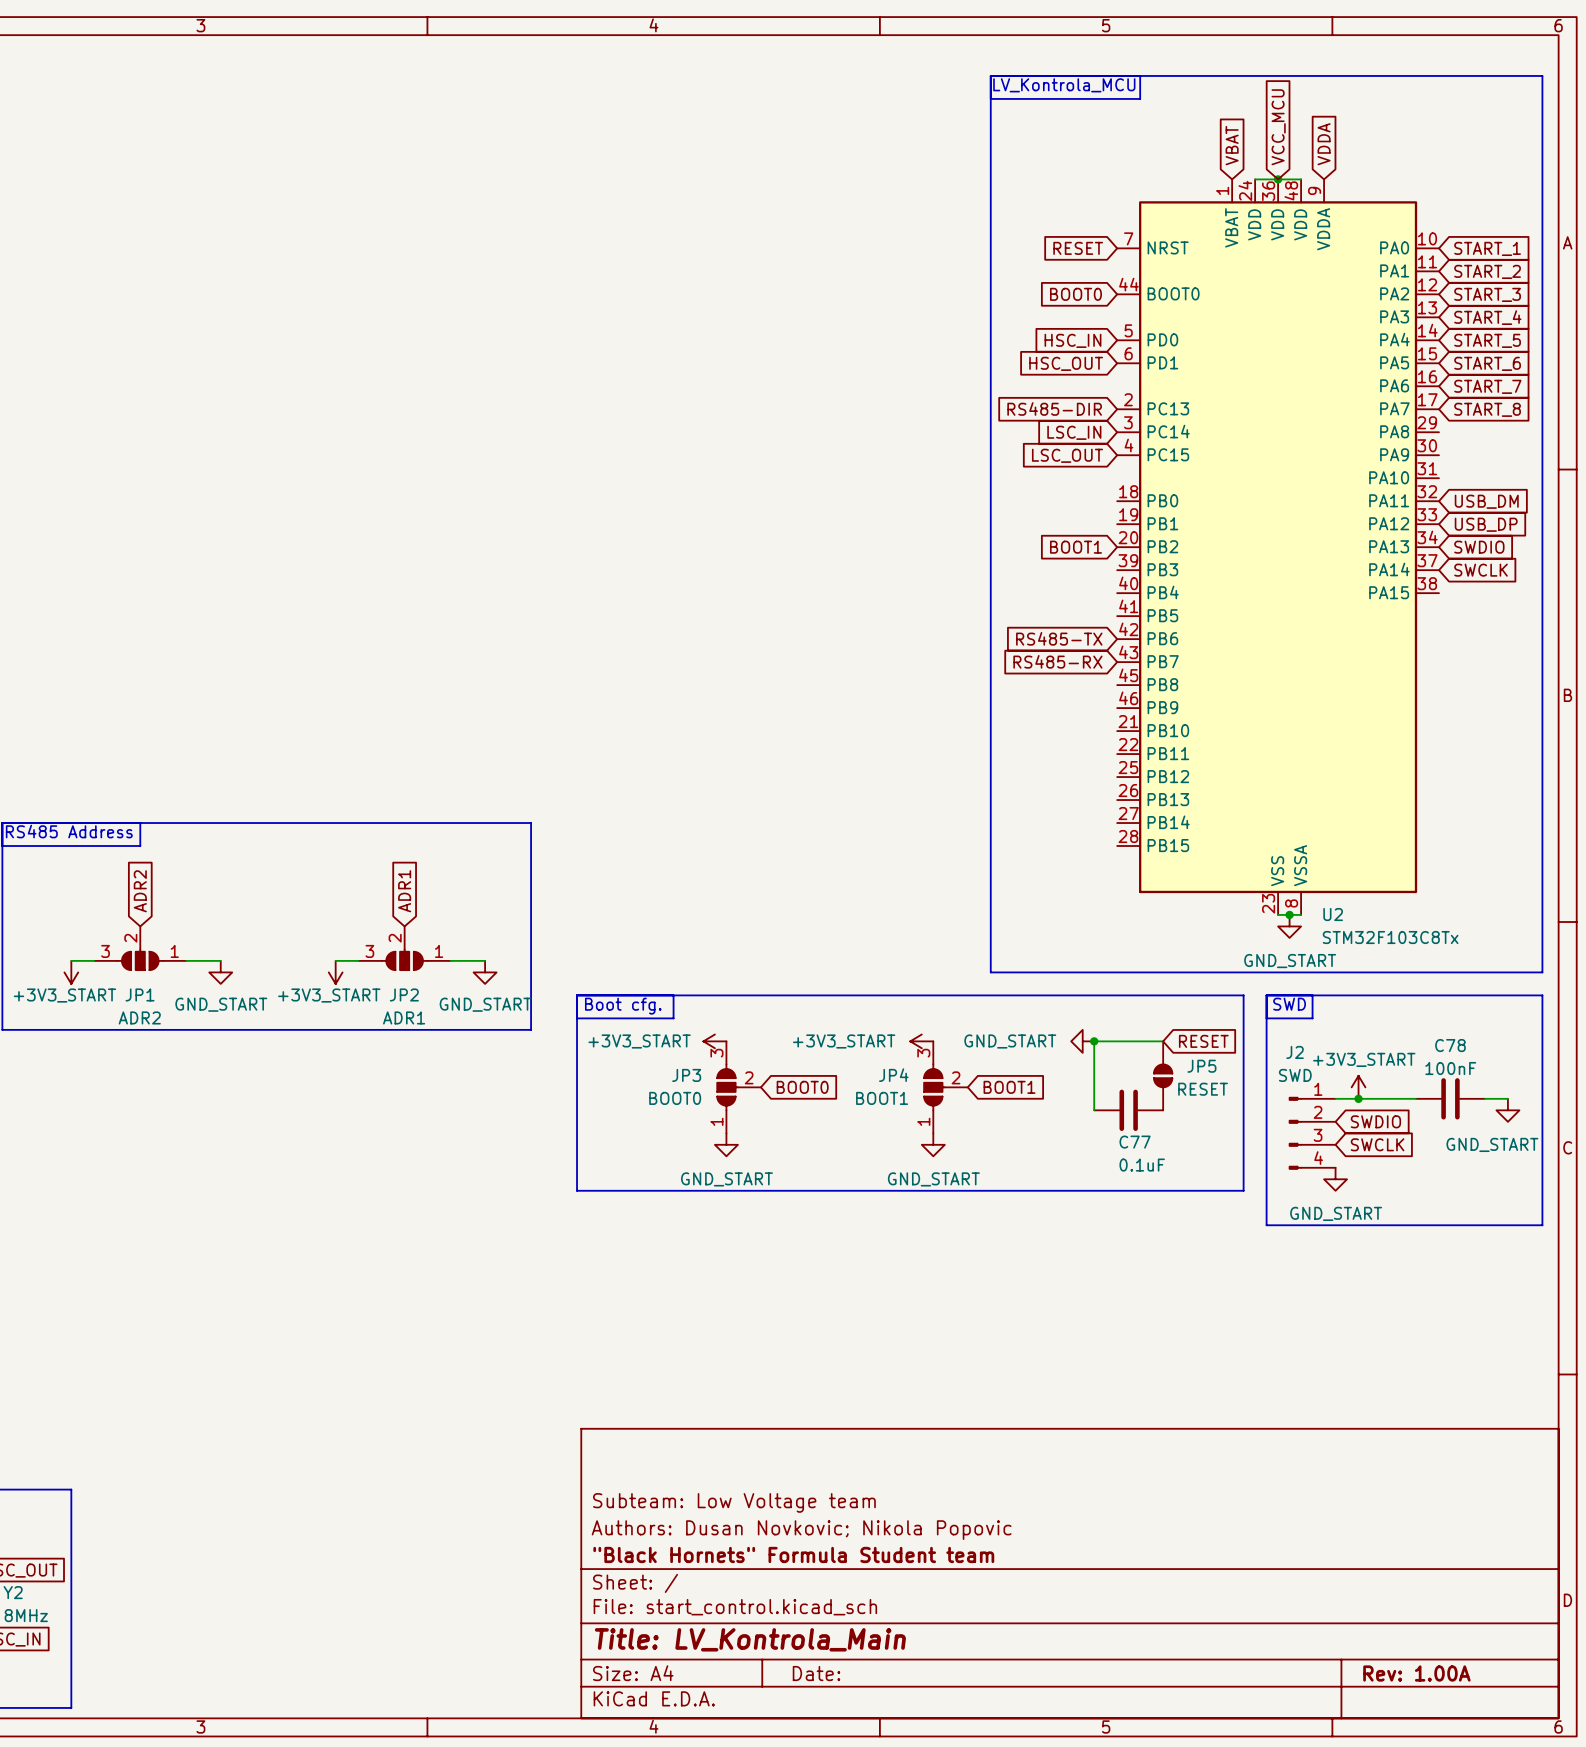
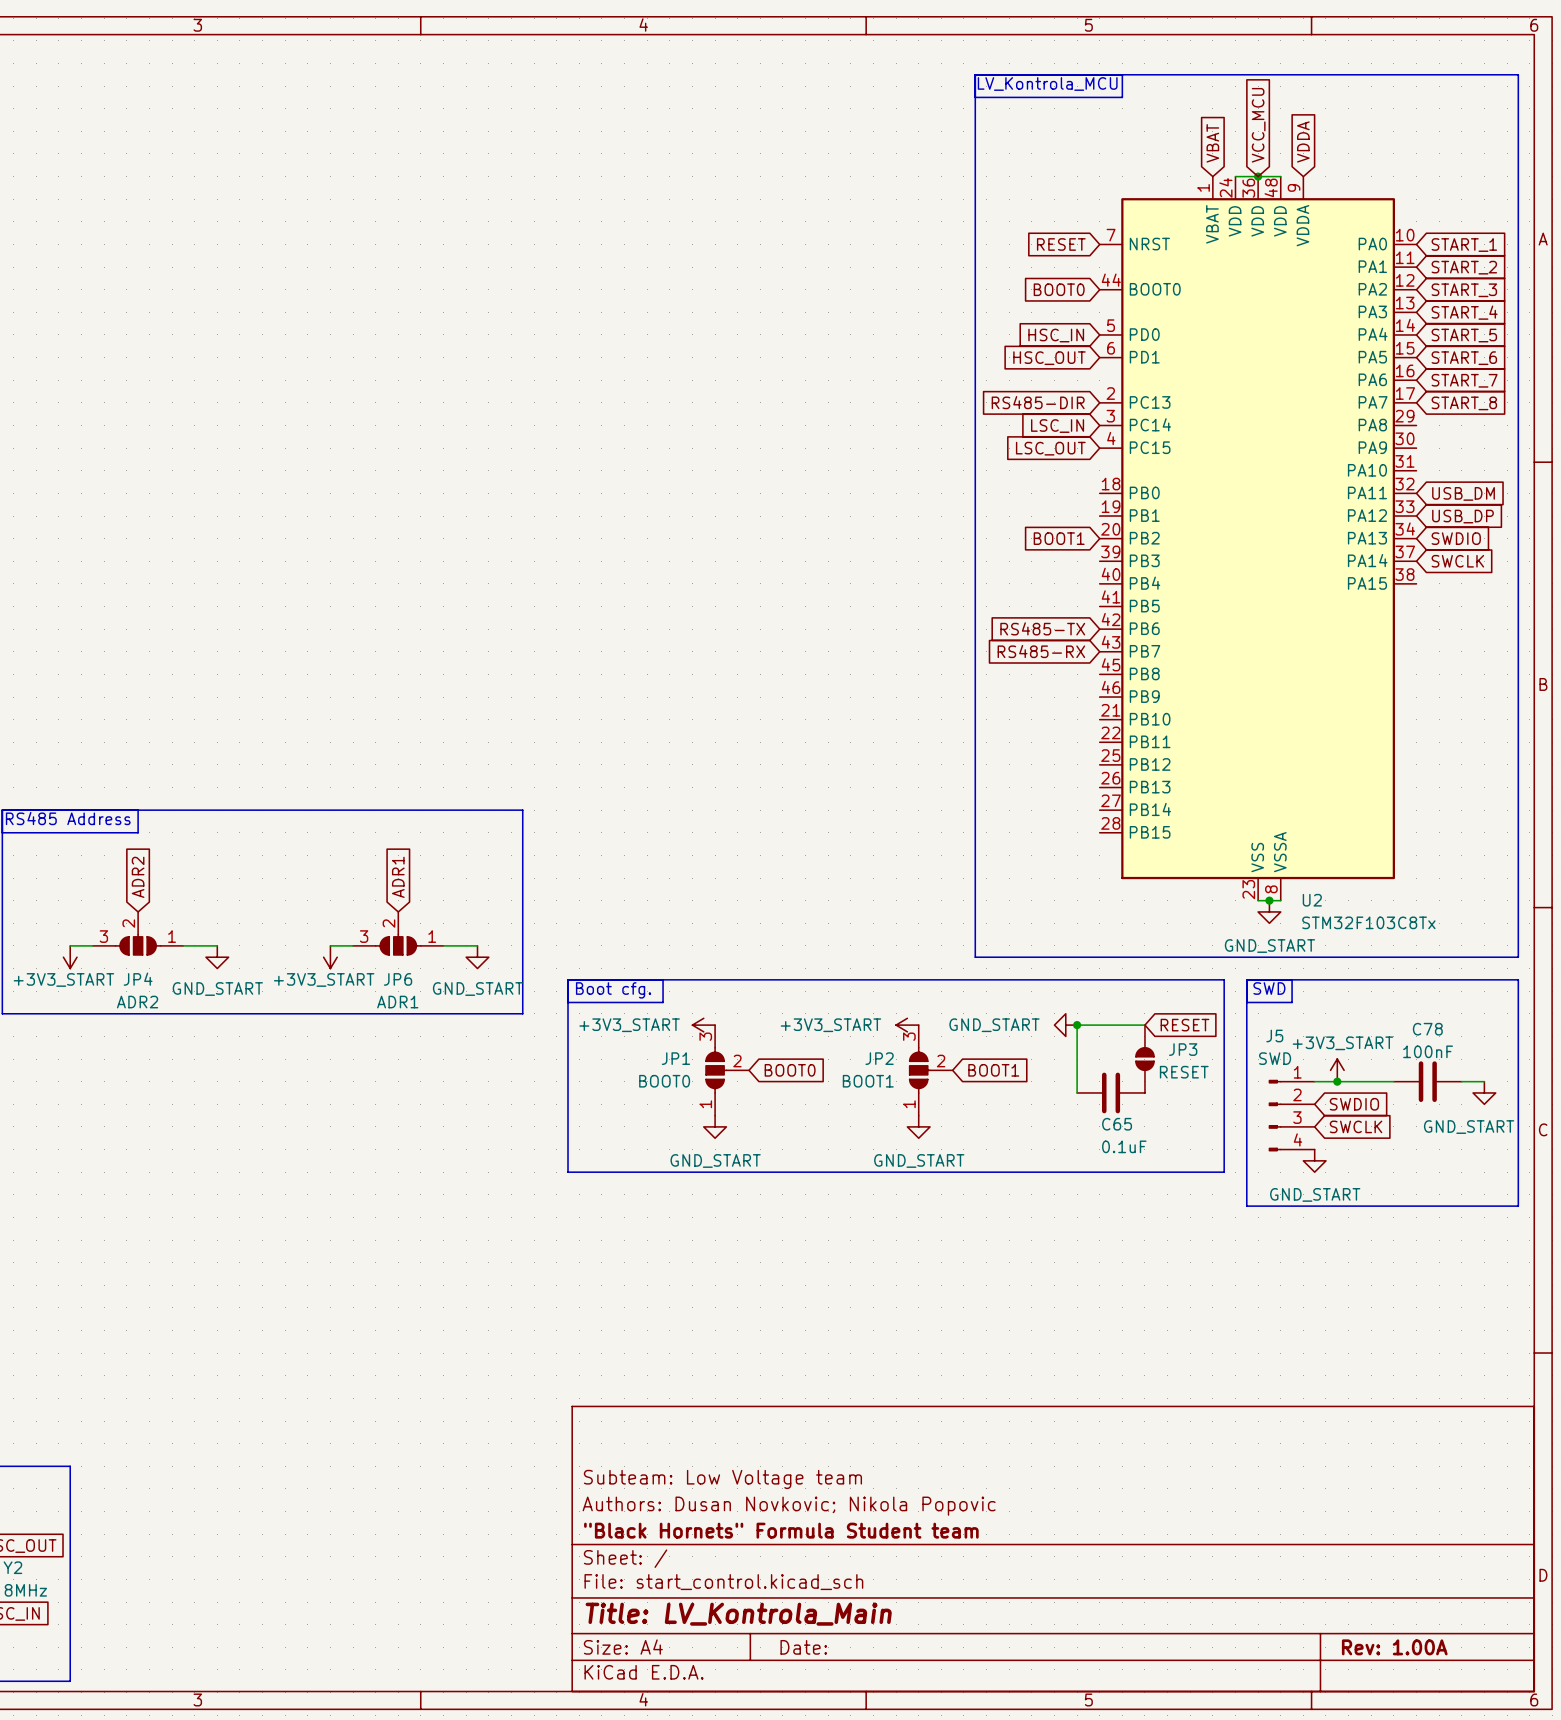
JP1 name: JP1 (140, 994) -> JP4 (138, 979)
JP2 name: JP2 (404, 994) -> JP6 (398, 979)
J2 name: J2 (1295, 1052) -> J5 (1274, 1035)
JP5 name: JP5 (1201, 1066) -> JP3 (1183, 1049)
JP3 name: JP3 (686, 1075) -> JP1 (675, 1058)
JP4 name: JP4 (893, 1075) -> JP2 (879, 1058)
C77 name: C77 (1135, 1142) -> C65 (1117, 1124)

